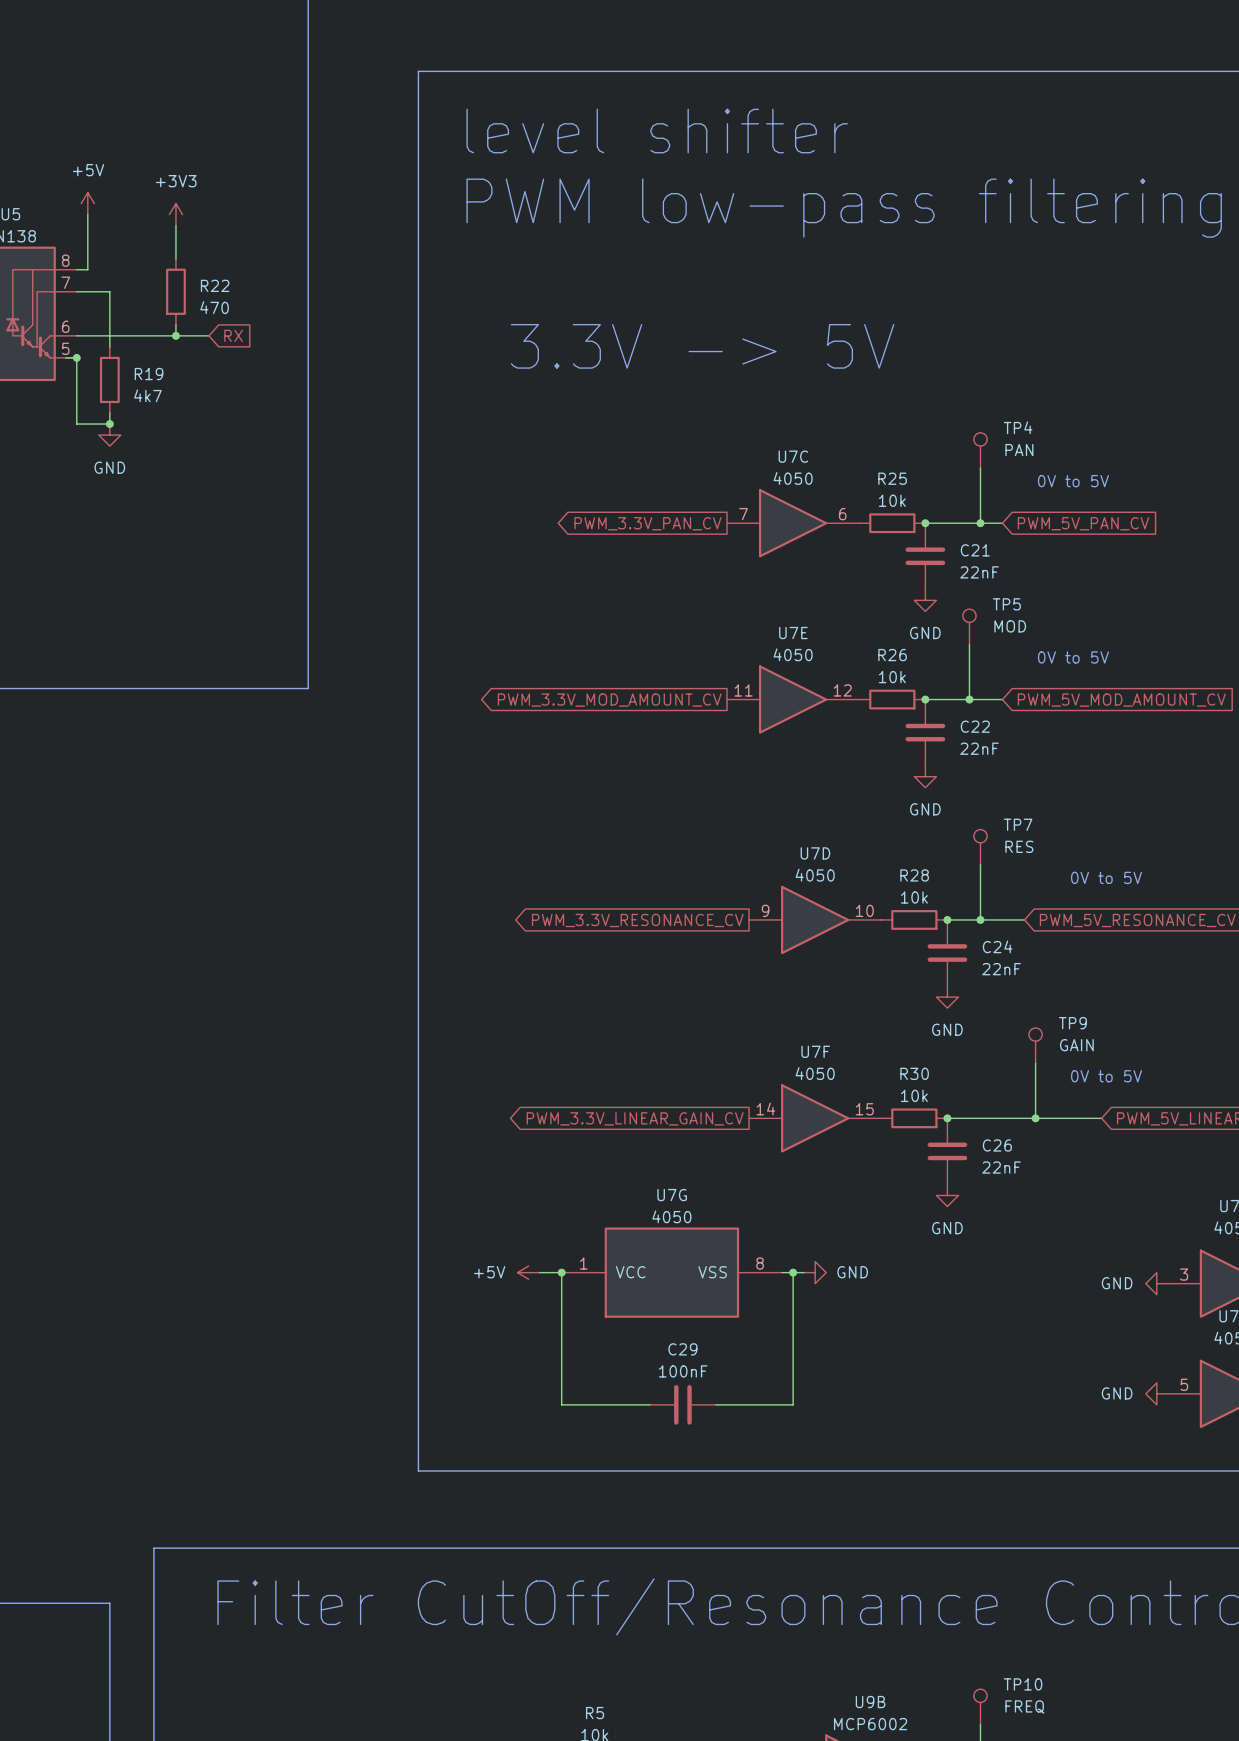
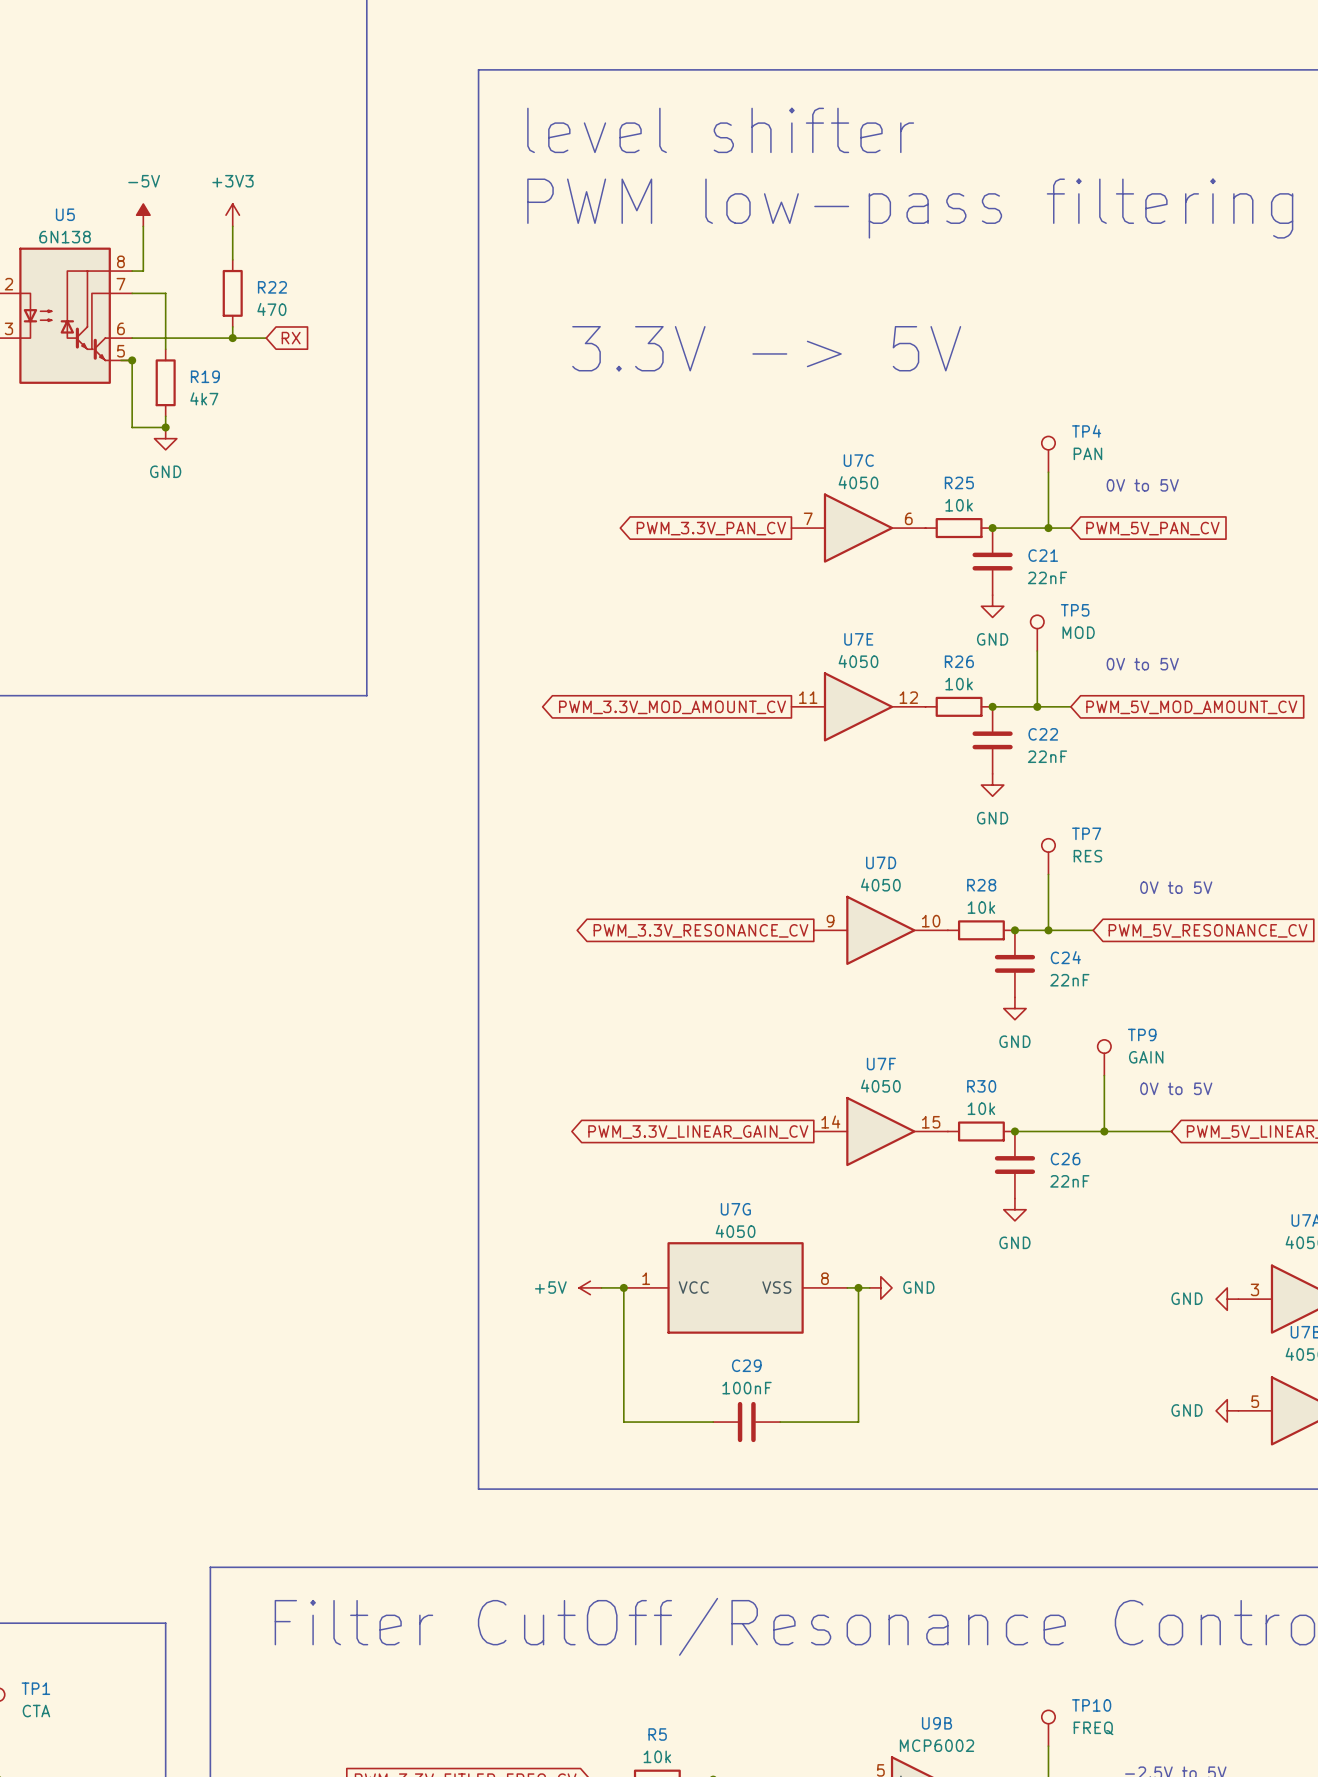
power symbol: +5V (87, 203) -> none
power symbol: none -> -5V (143, 215)

